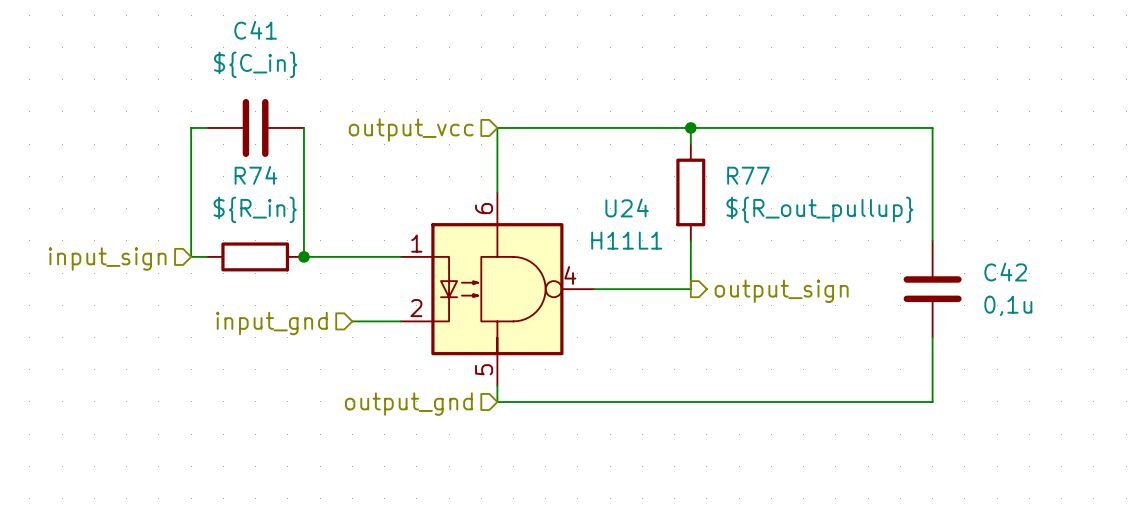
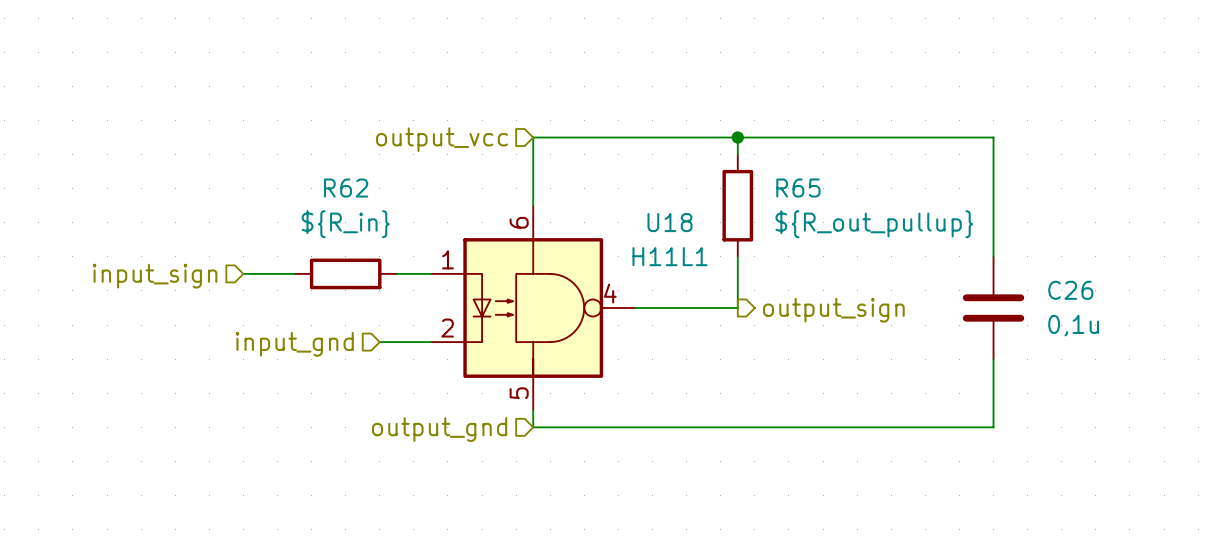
wire: (207, 127) (191, 127) (191, 256) (206, 256) -> none
C41: ${C_in} (255, 127) -> none
wire: (303, 127) (303, 256) -> none
R77 name: R77 (748, 175) -> R65 (798, 188)
U24 name: U24 (627, 207) -> U18 (670, 222)
wire: none -> (243, 273) (294, 273)
R74: ${R_in} (255, 256) -> none
wire: (303, 256) (368, 256) -> none
junction: (303, 256) -> none
R62: none -> ${R_in} (345, 273)
hierarchical label position: input_sign (107, 259) -> input_sign (155, 276)
C42 name: C42 (1005, 272) -> C26 (1070, 290)

